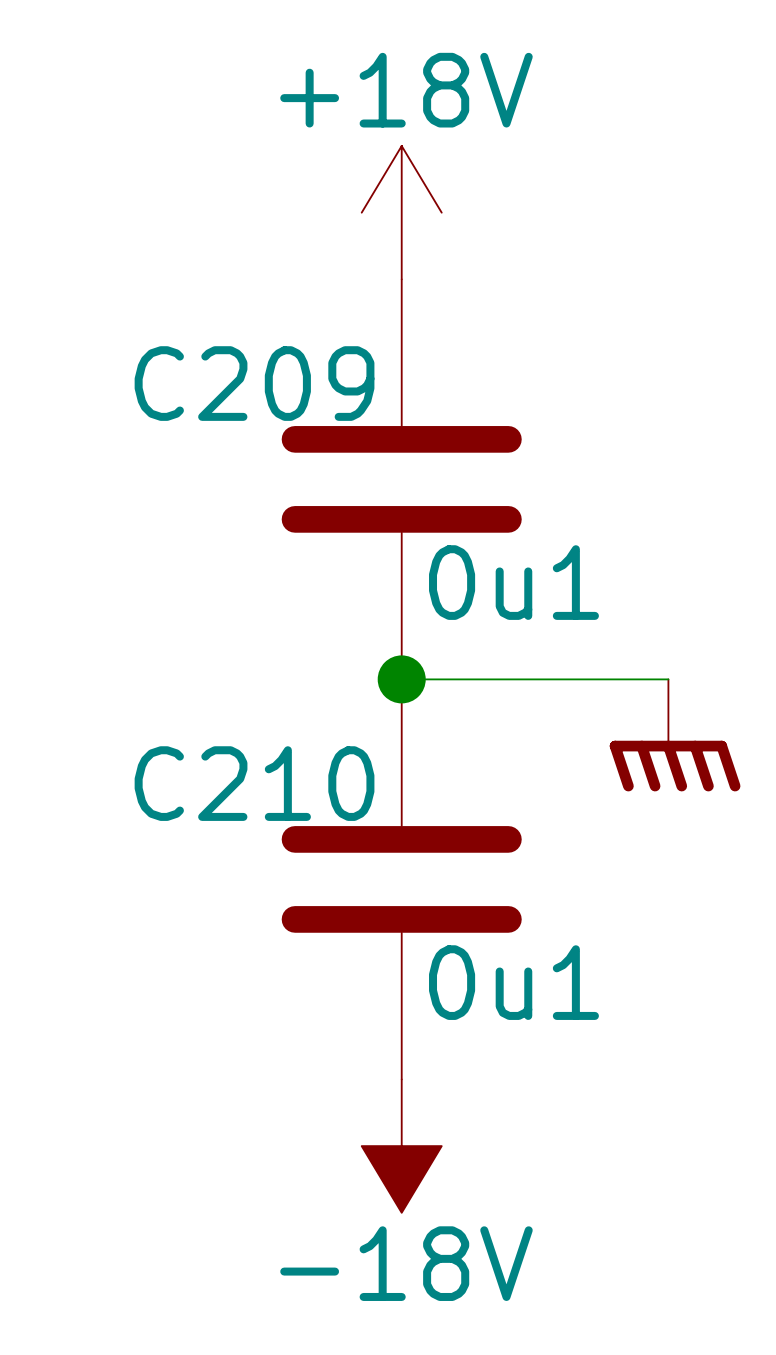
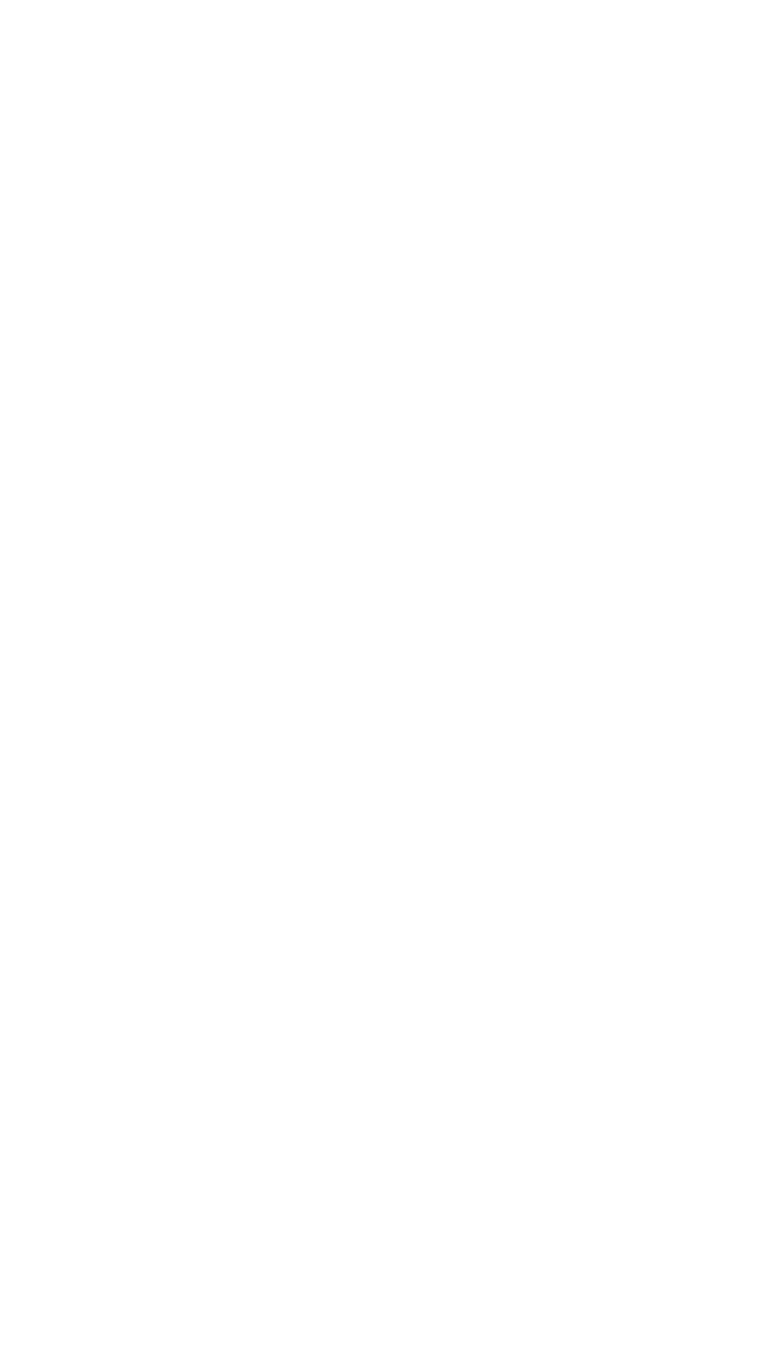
power symbol: +18V (401, 212) -> none
C209: 0u1 (401, 479) -> none
wire: (401, 679) (668, 679) -> none
junction: (401, 679) -> none
power symbol: (675, 735) -> none
C210: 0u1 (401, 879) -> none
power symbol: -18V (401, 1146) -> none

